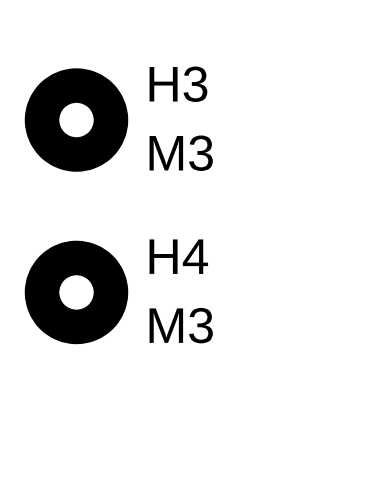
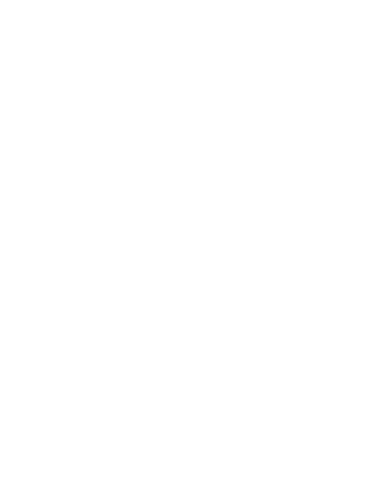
H3: M3 (76, 120) -> none
H4: M3 (76, 292) -> none

